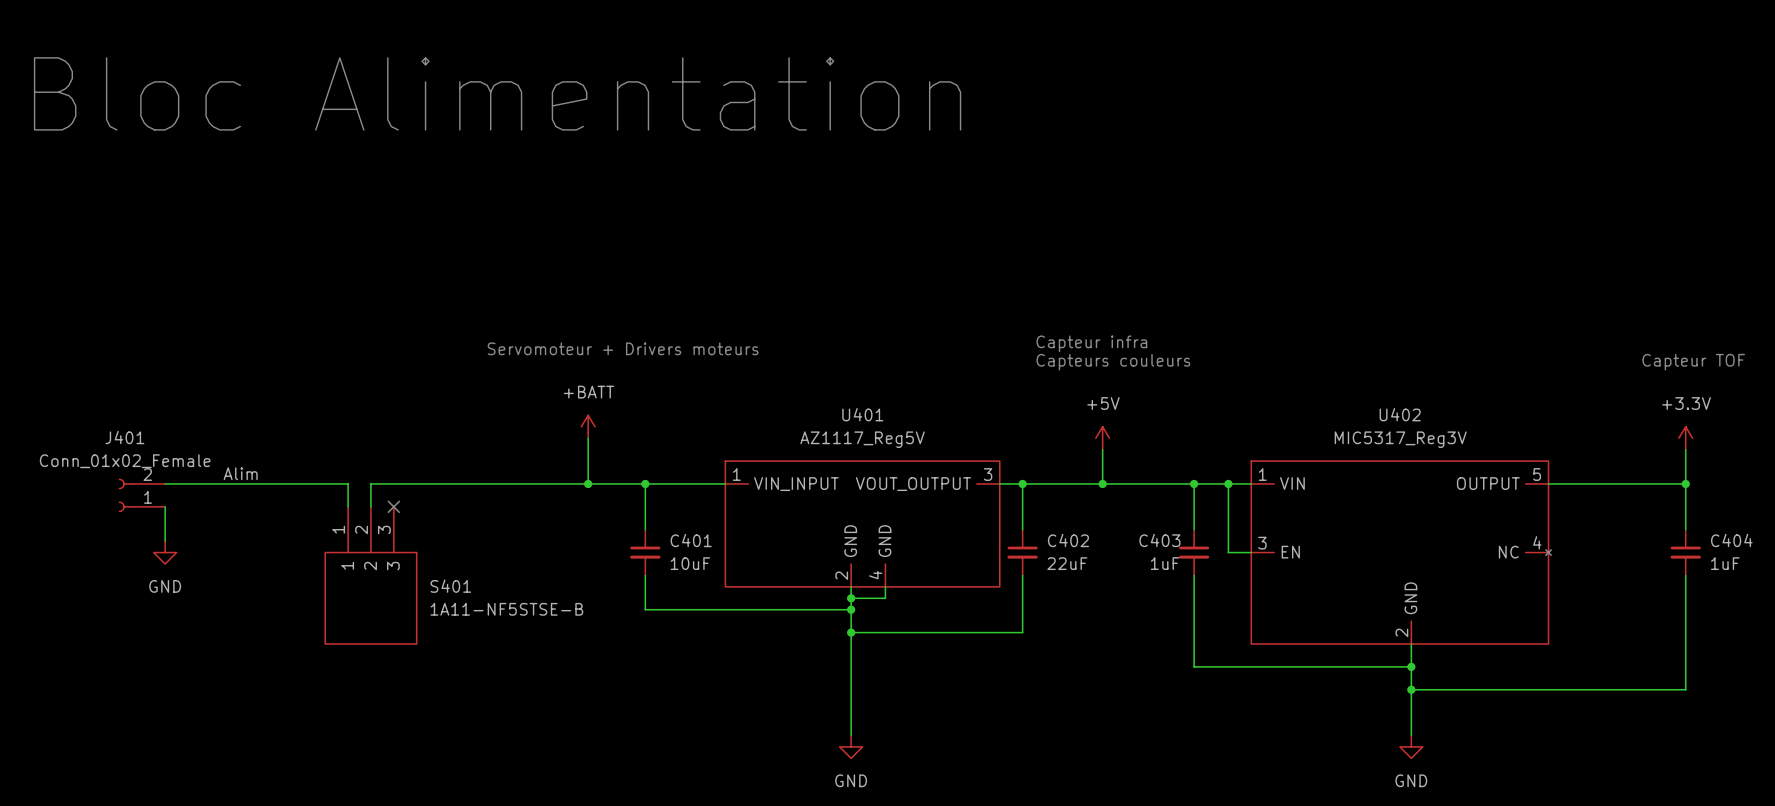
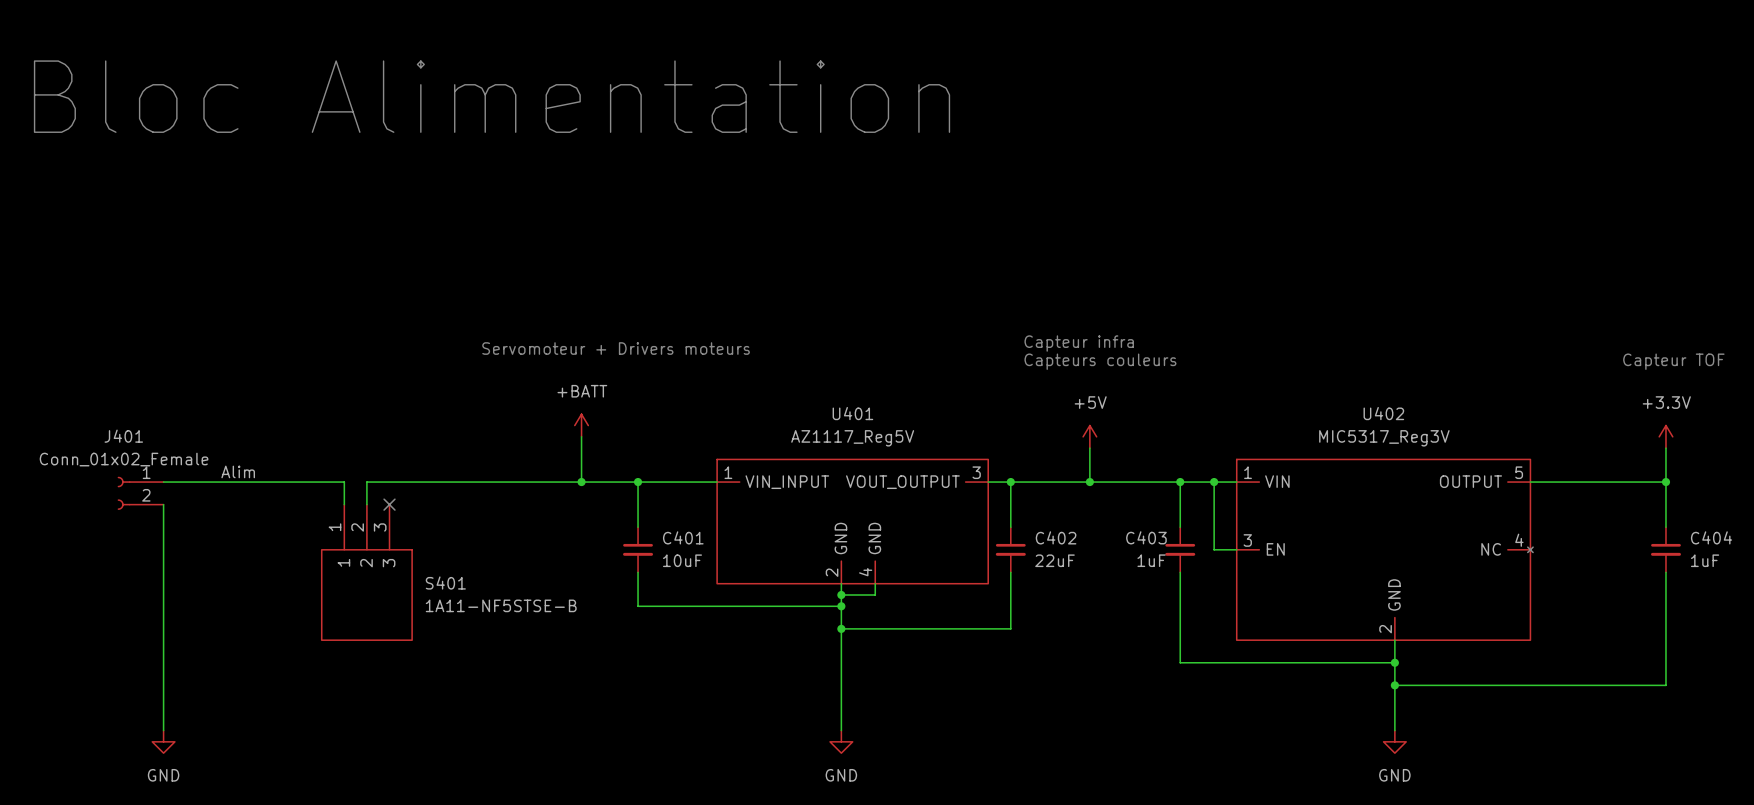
J401 flip: as is (125, 495) -> up-down (124, 493)
wire: none -> (163, 538) (163, 730)
power symbol position: GND (165, 552) -> GND (163, 741)

